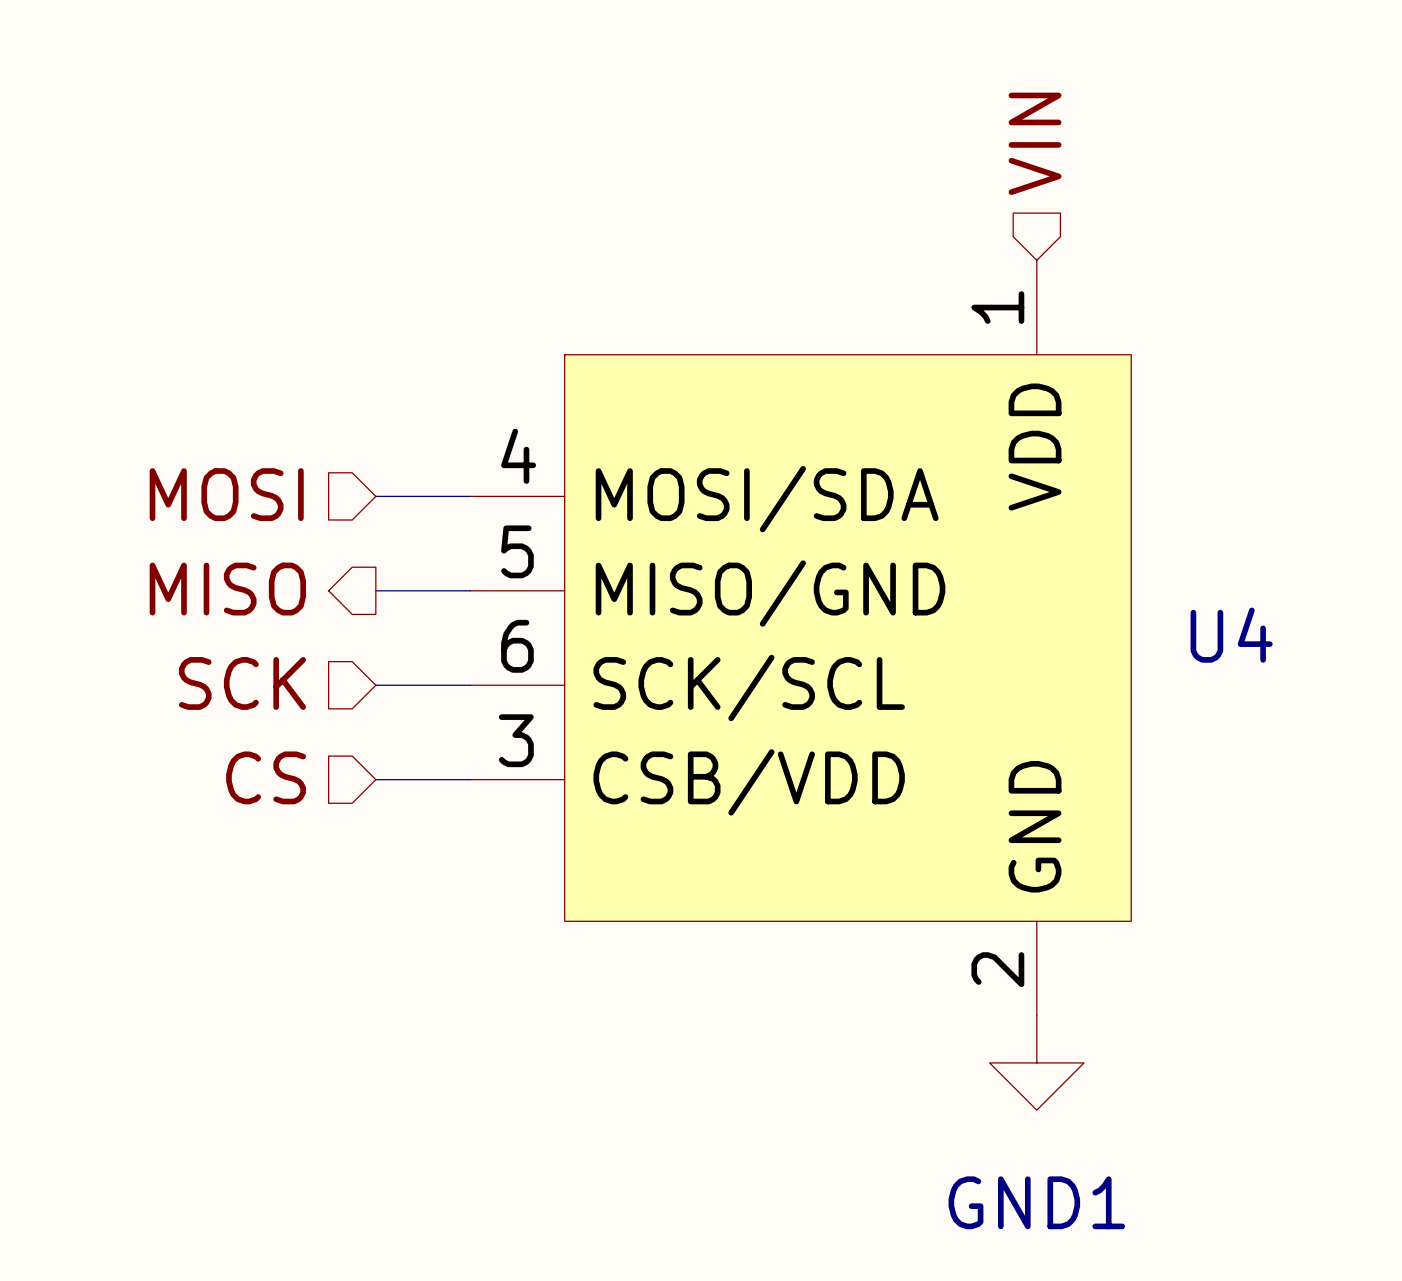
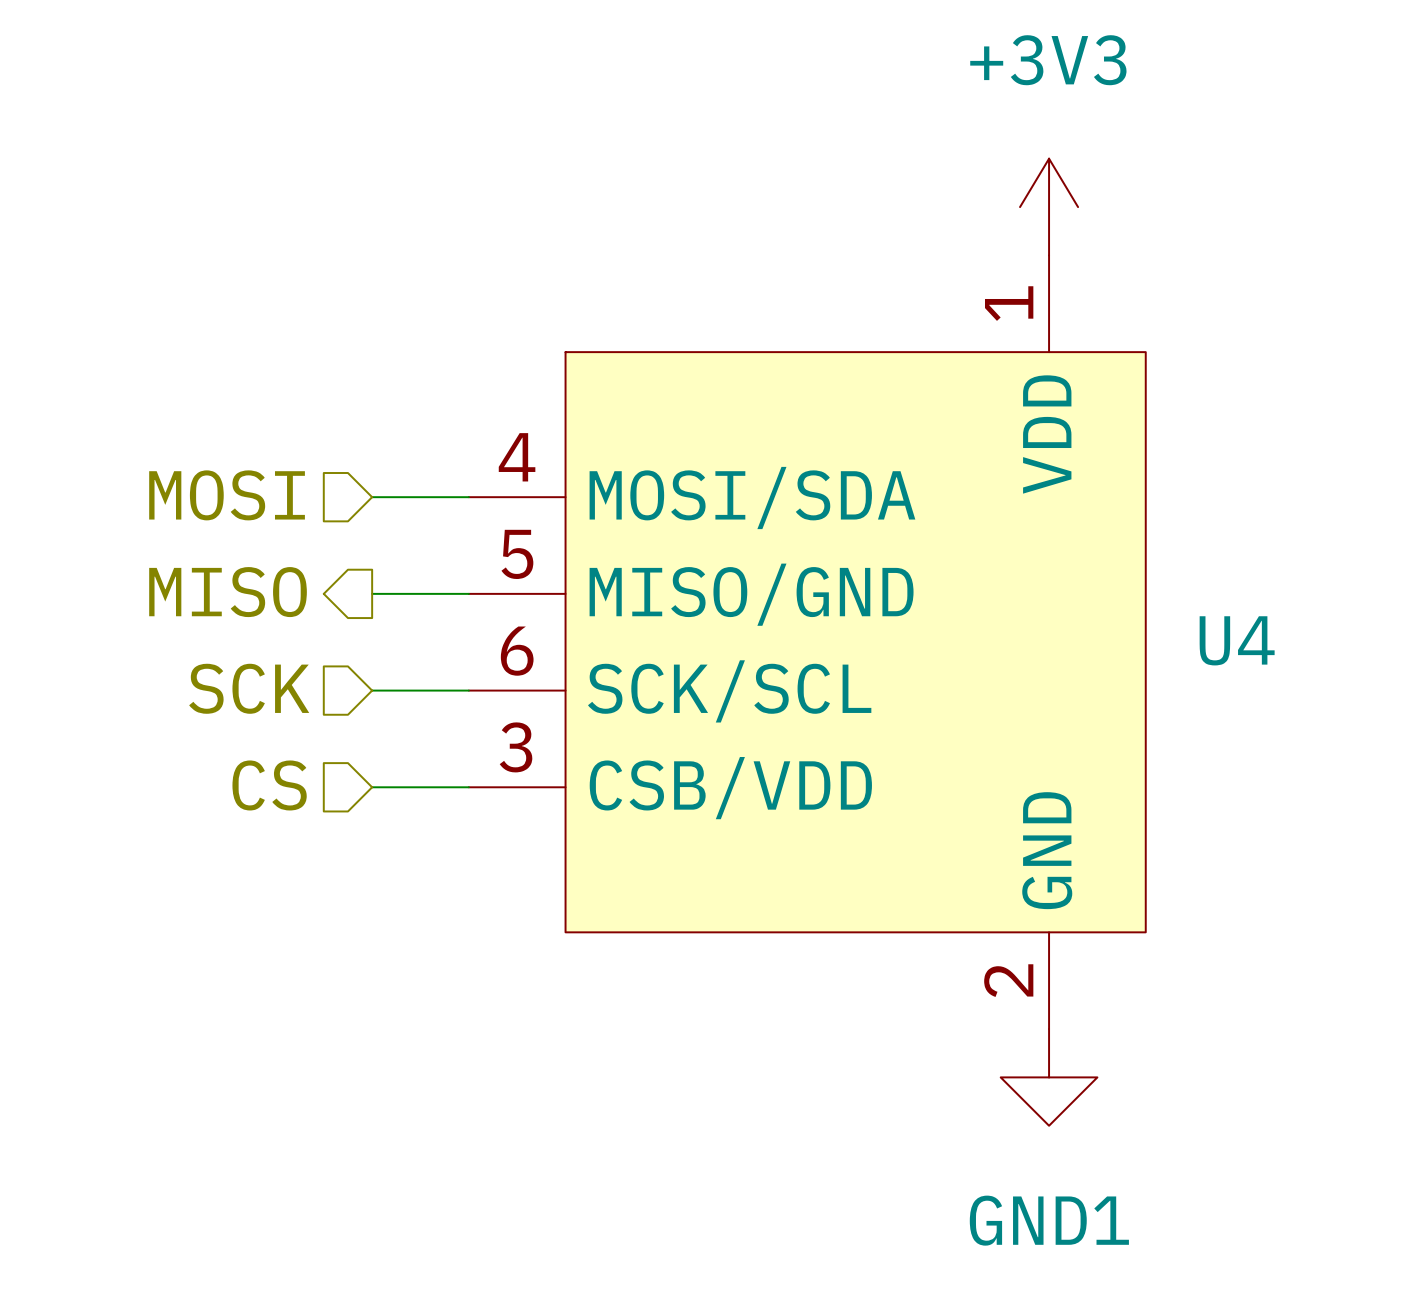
hierarchical label: VIN (1035, 143) -> none
power symbol: none -> +3V3 (1049, 207)

